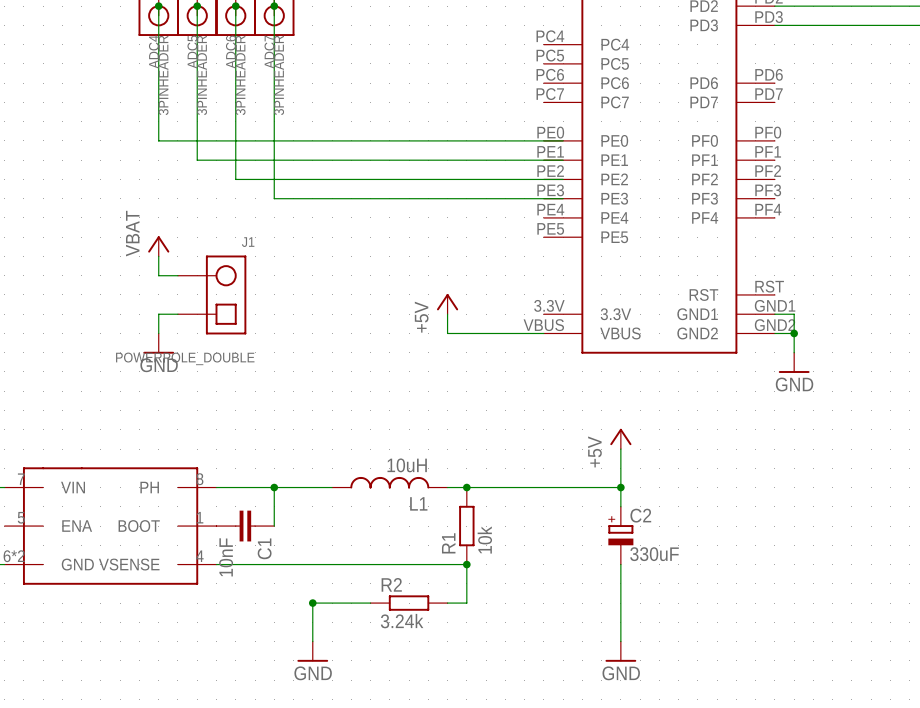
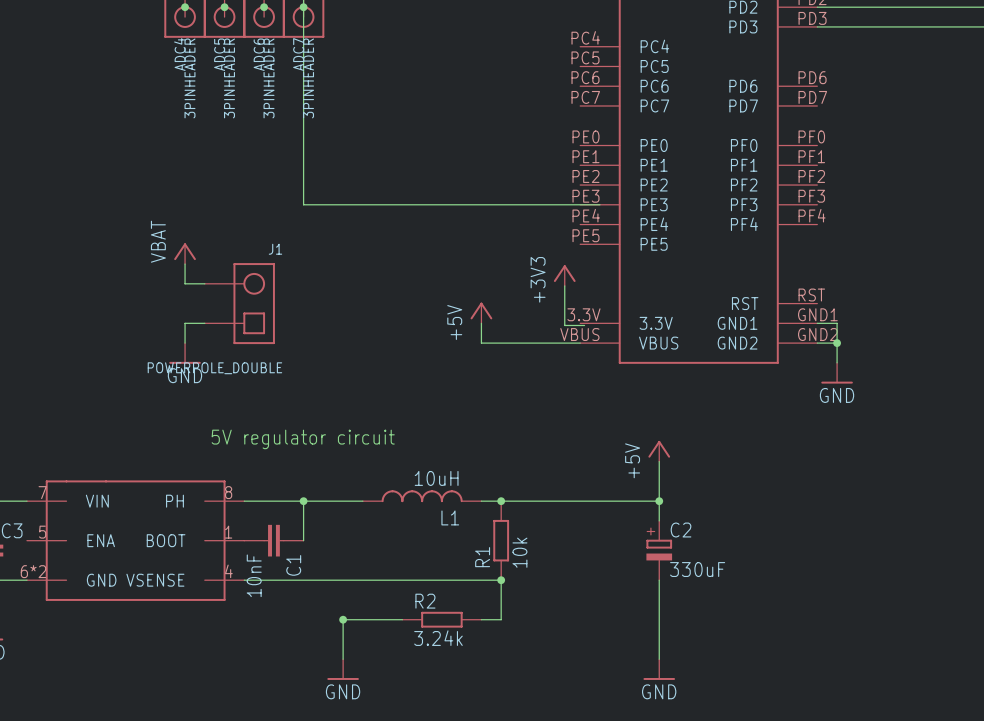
wire: (158, 6) (158, 140) (563, 140) -> none
wire: (197, 6) (197, 160) (563, 160) -> none
wire: (235, 6) (235, 179) (563, 179) -> none
power symbol: none -> +3V3 (564, 275)
wire: none -> (564, 285) (564, 325) (584, 325)
text: none -> 5V regulator circuit (303, 439)

